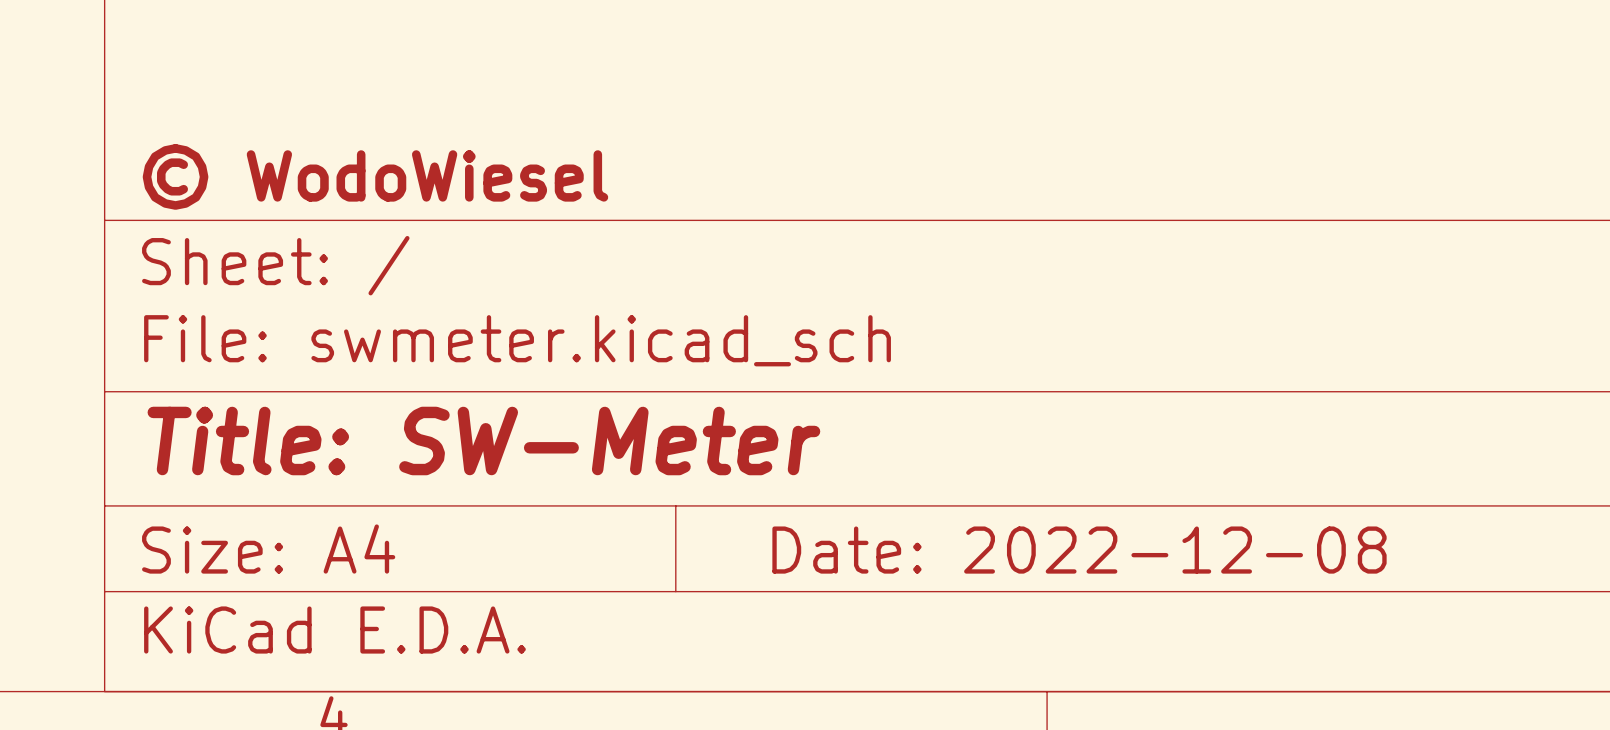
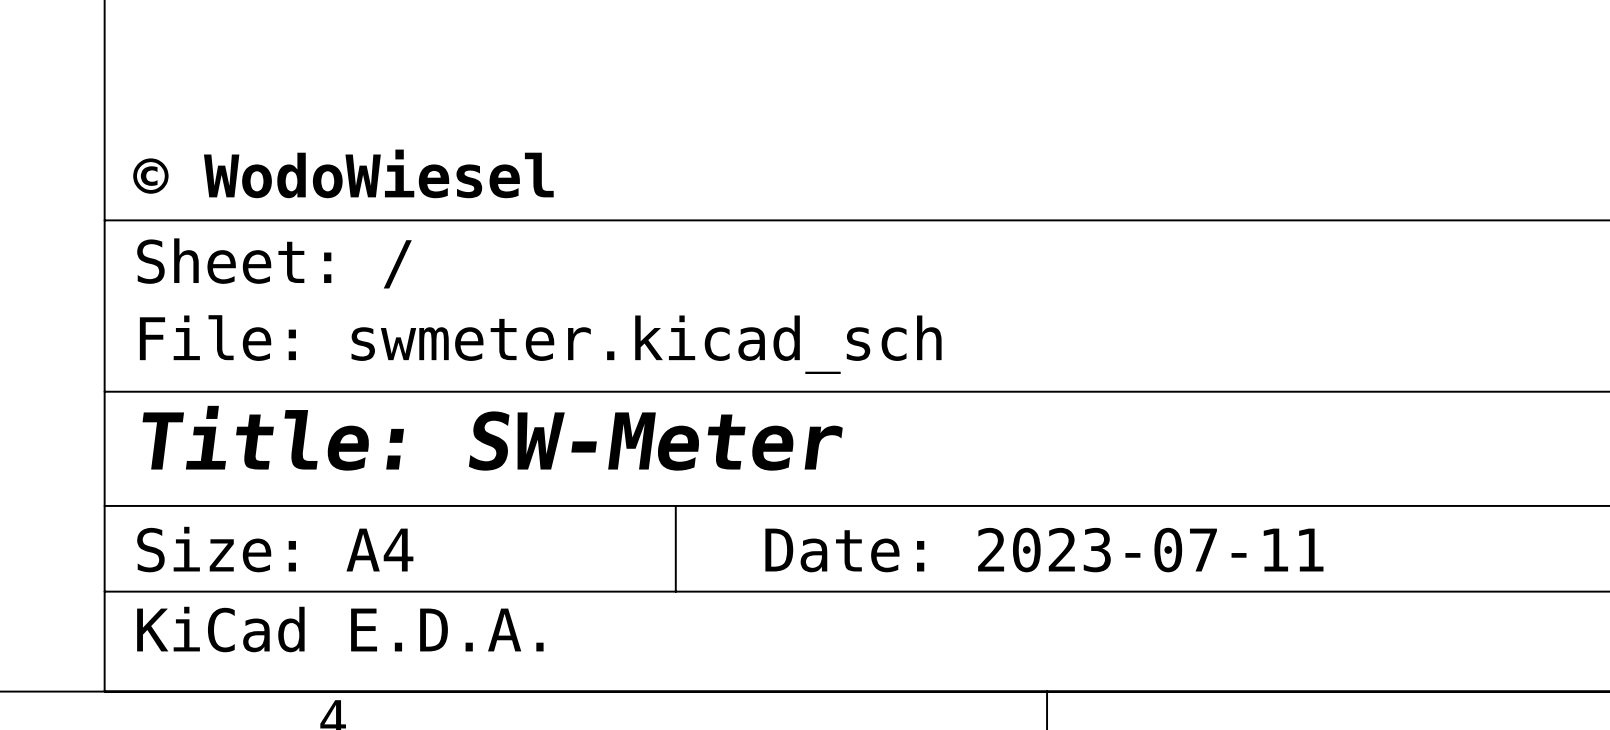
title block: Date: 2022-12-08 (1079, 550) -> Date: 2023-07-11 (1044, 550)

